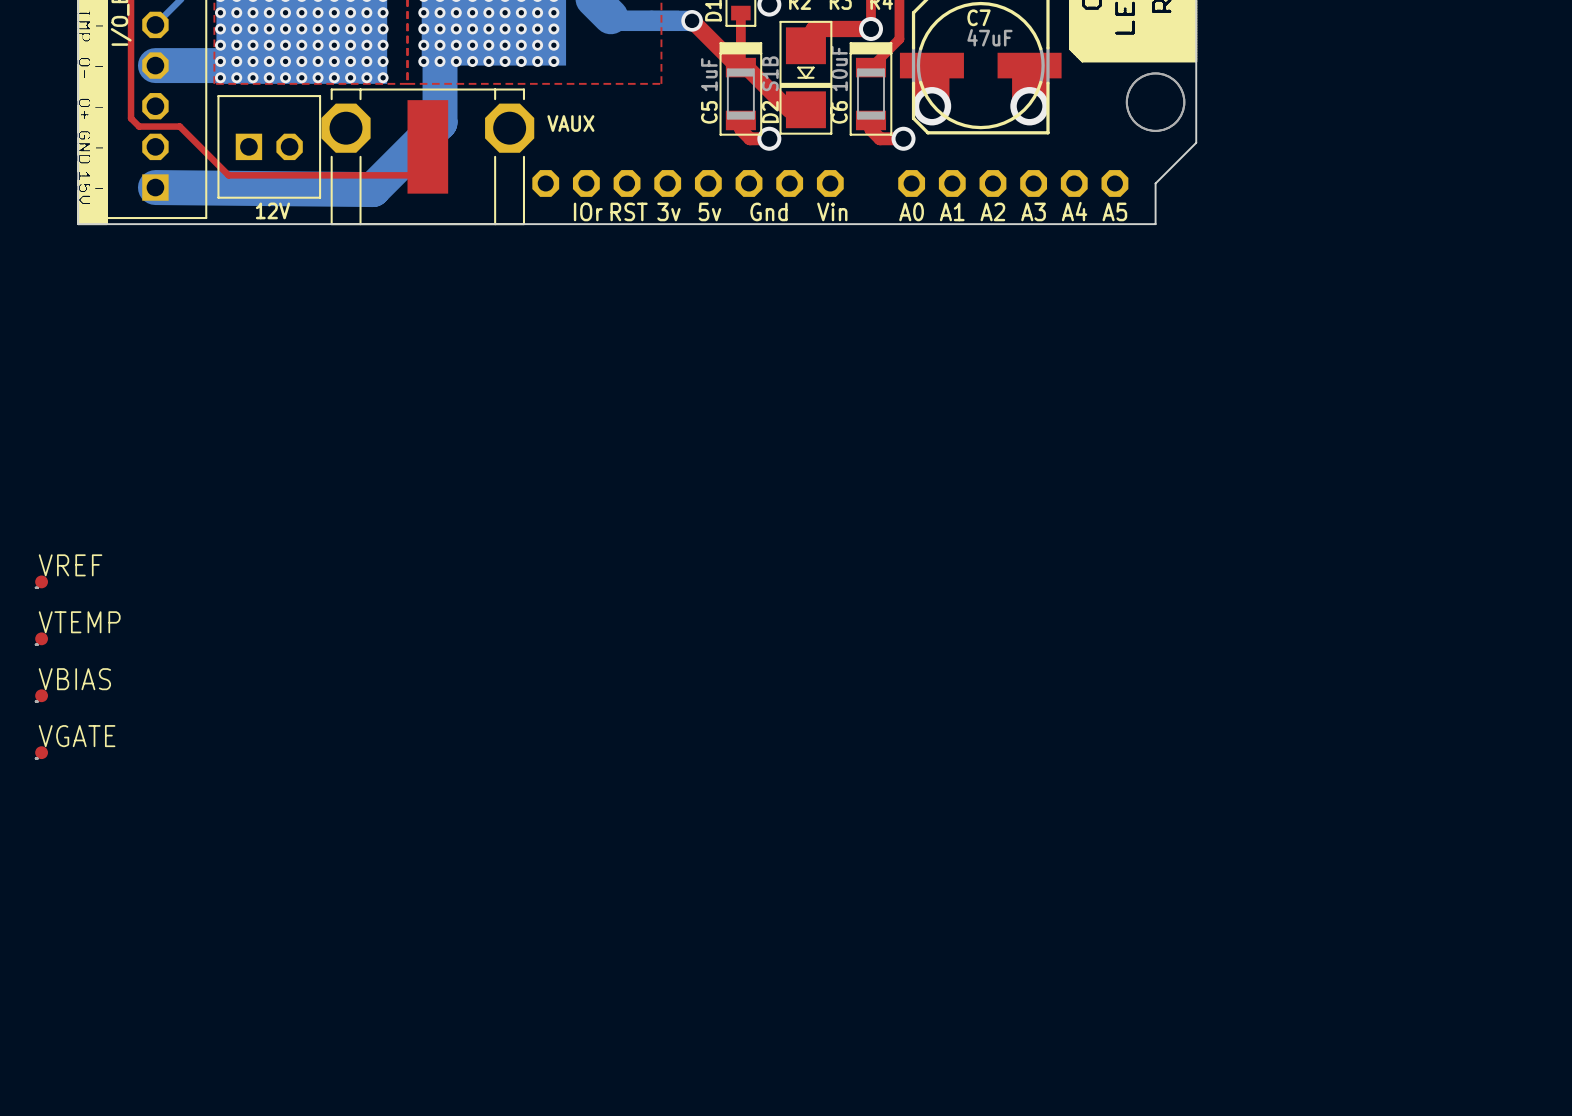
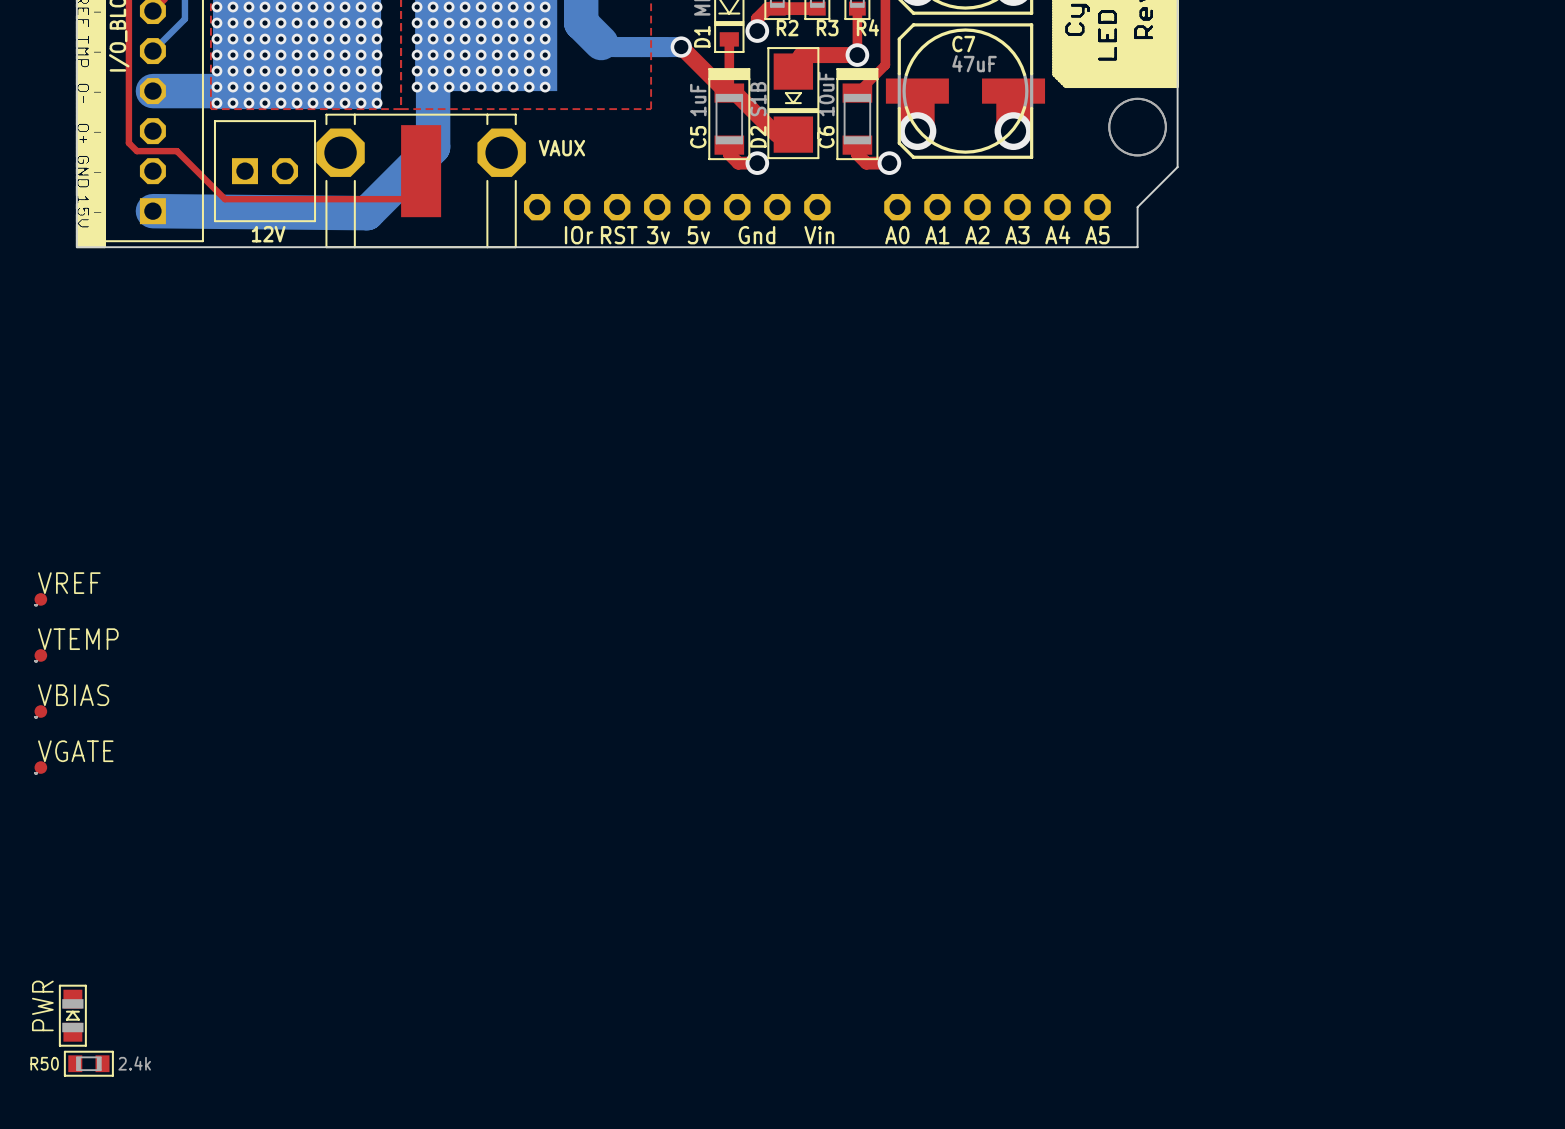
PWR: none -> (72, 1015)
R50: none -> 2.4k (88, 1063)

